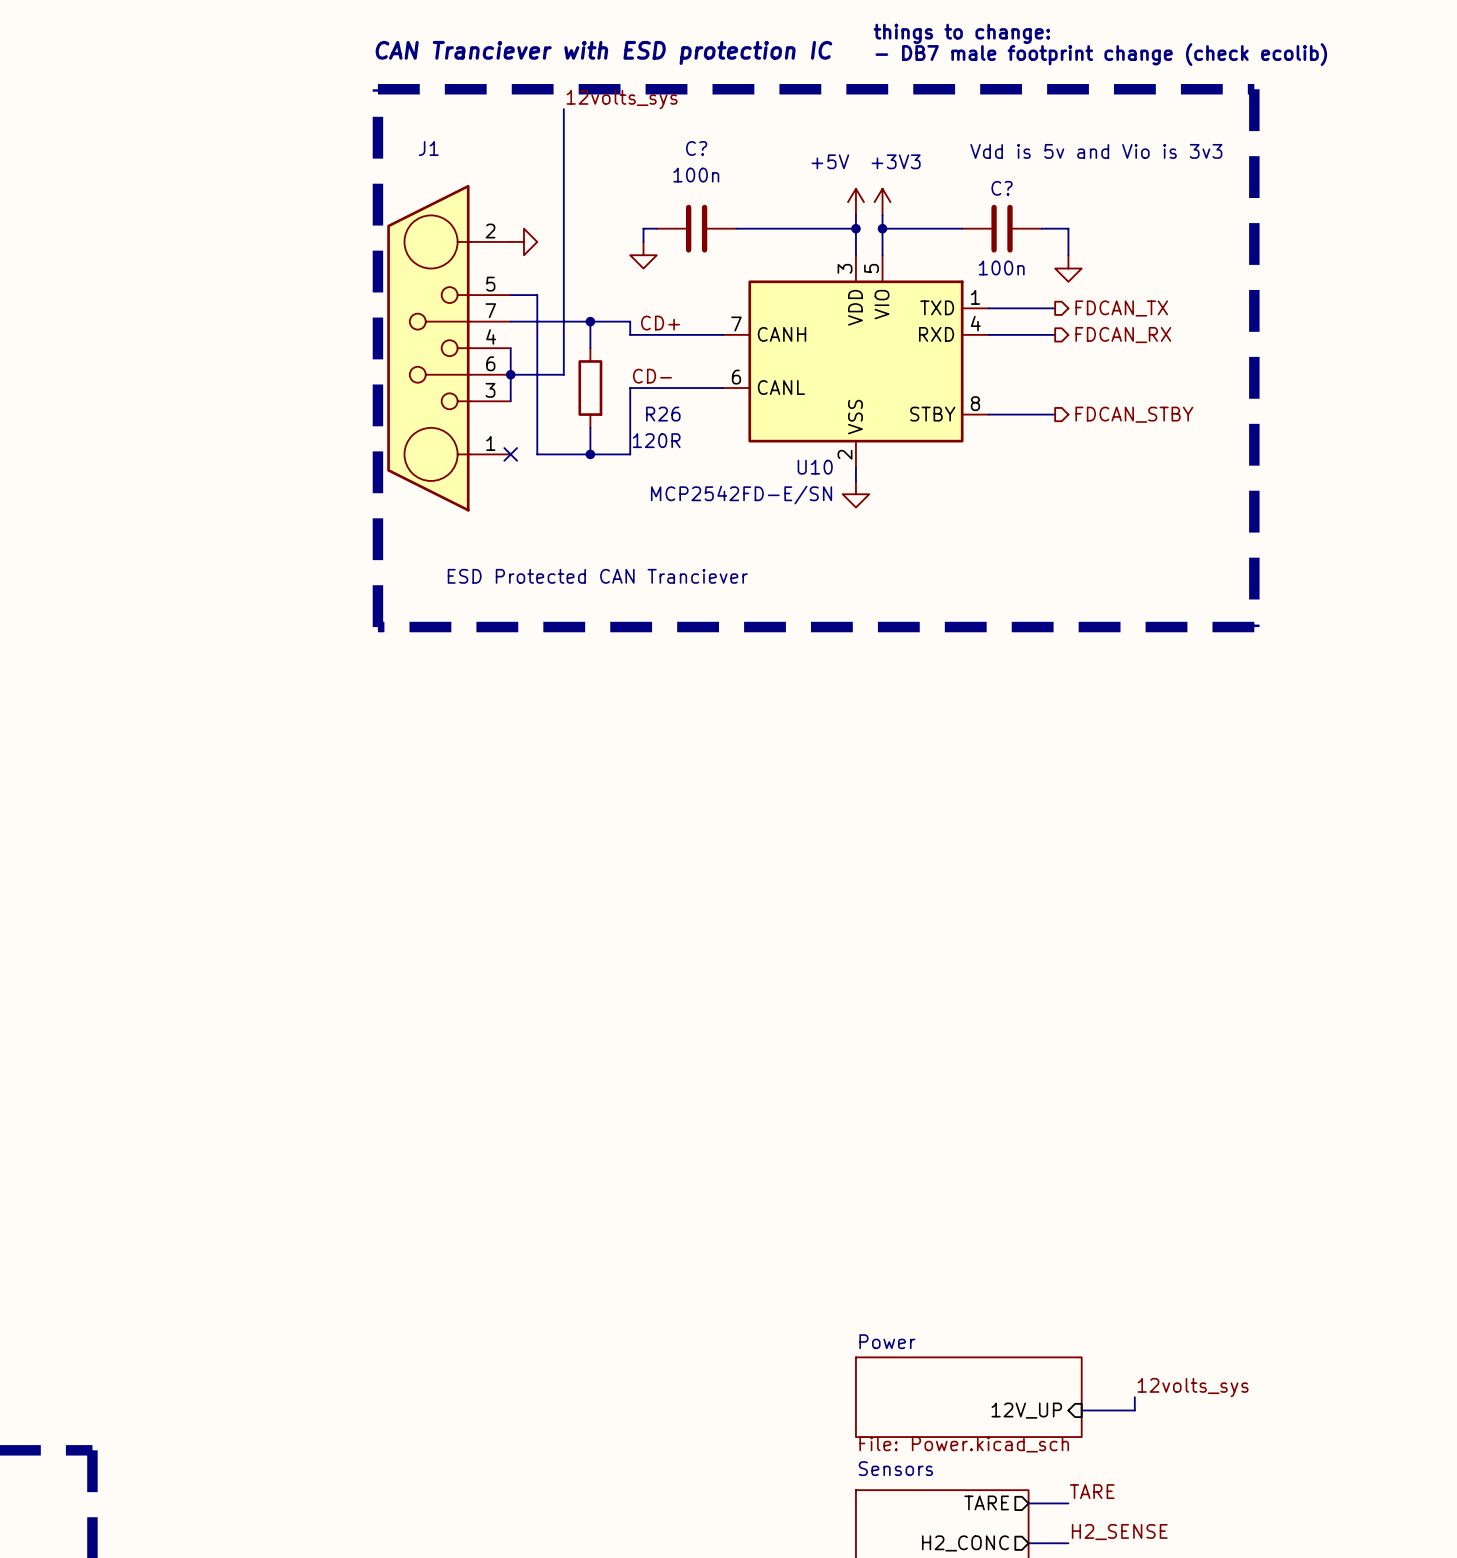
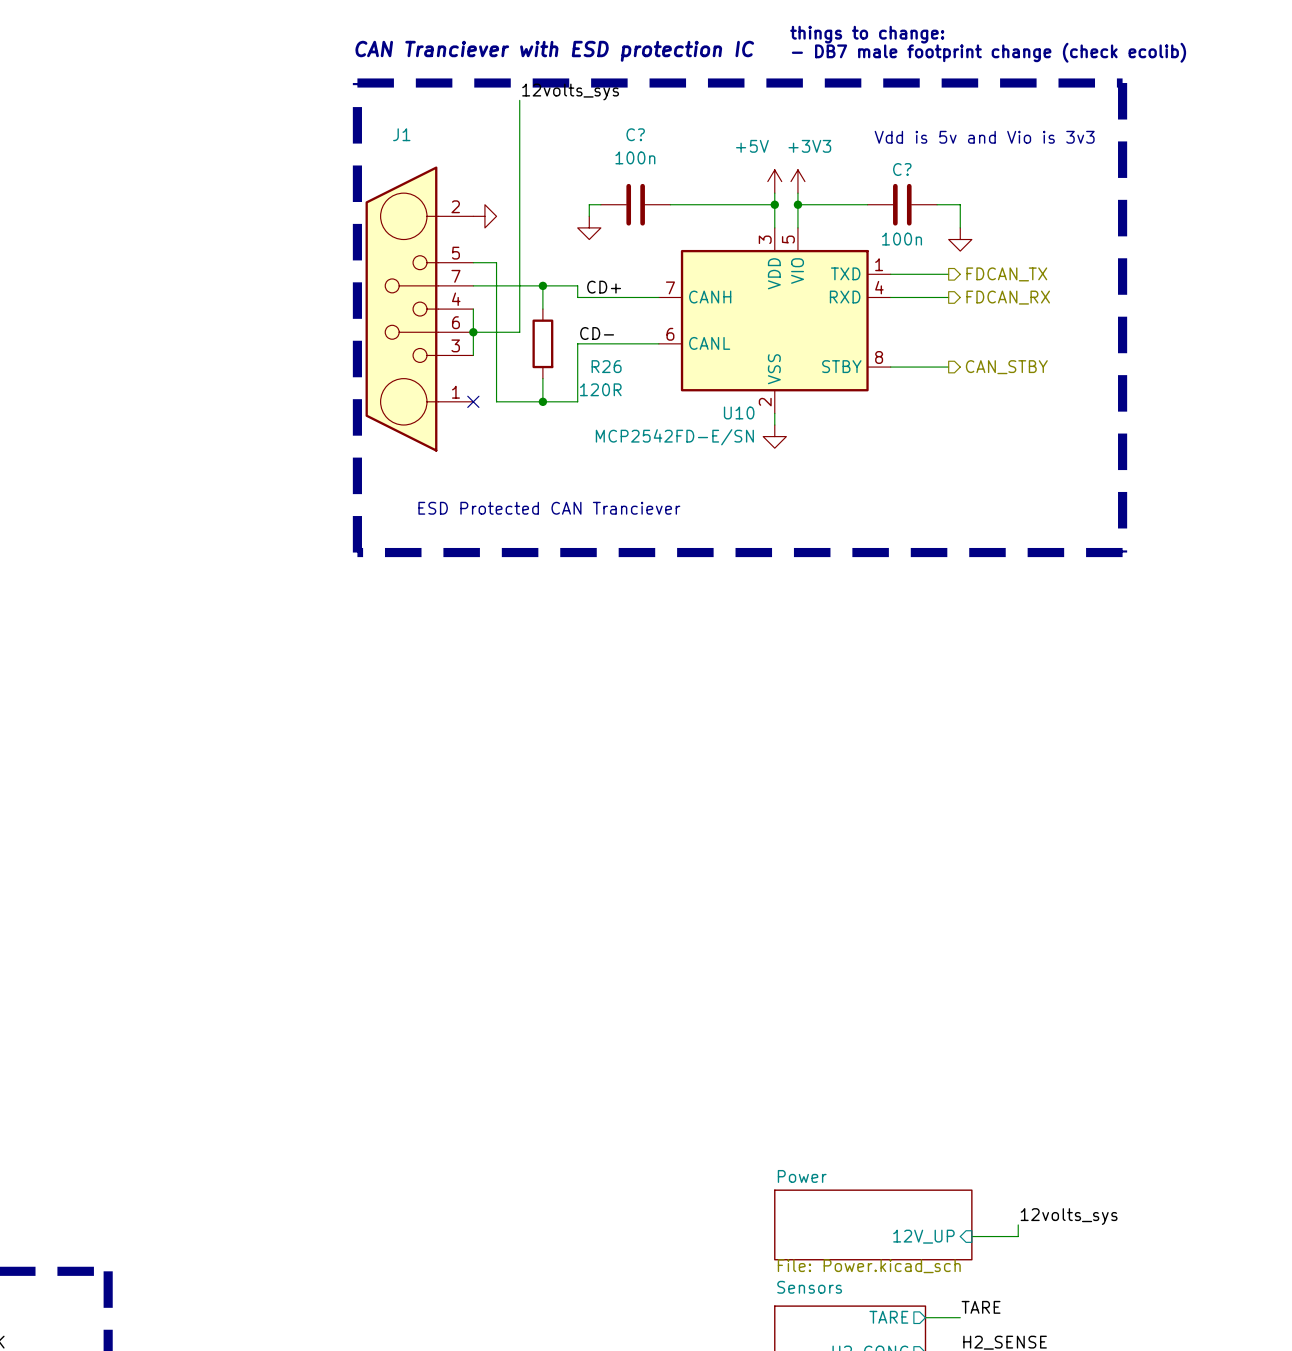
hierarchical label: FDCAN_STBY (1134, 414) -> CAN_STBY (1006, 367)

